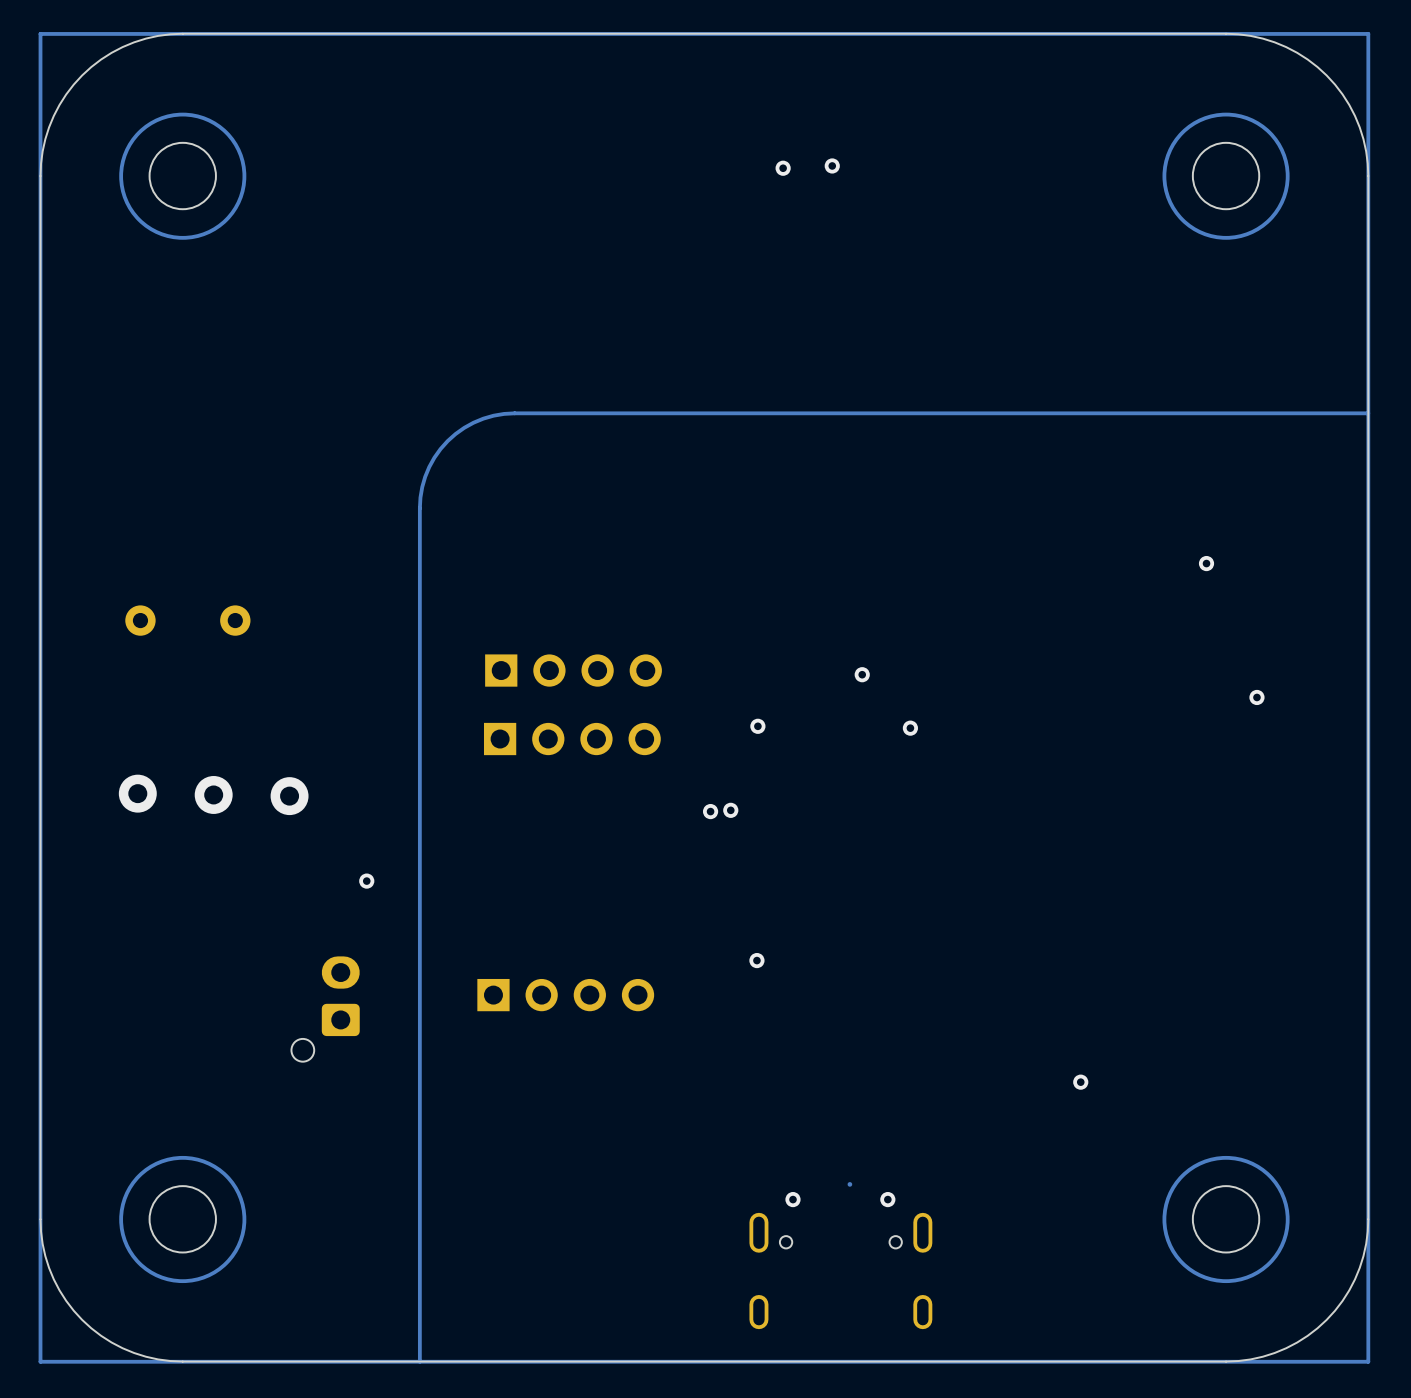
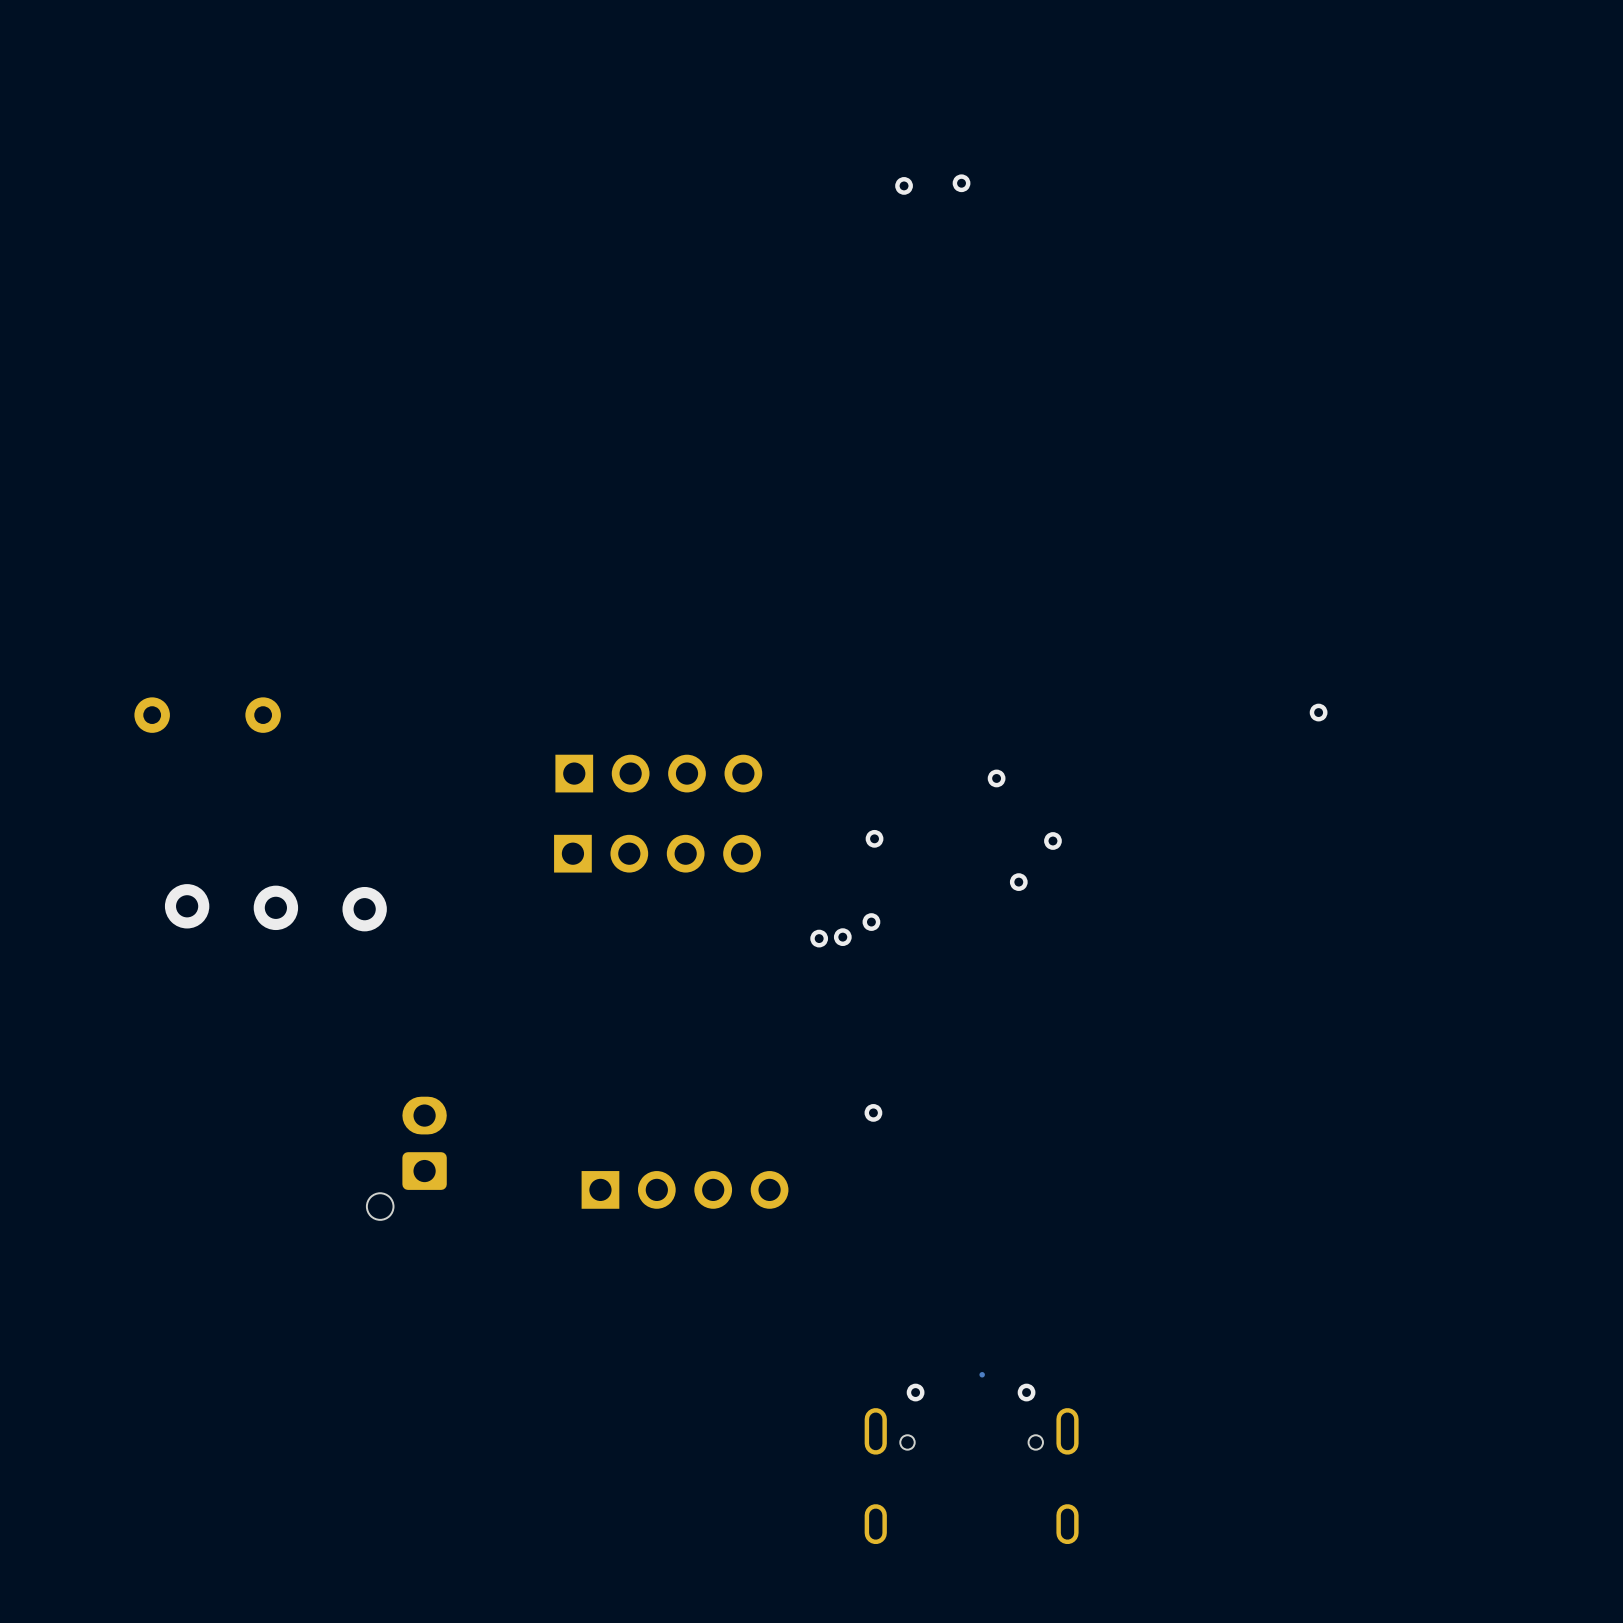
board edge: (1226, 33) (170, 34) (145, 38) (122, 47) (91, 67) (73, 84) (59, 104) (49, 127) (42, 151) (40, 176) (40, 1219) (45, 1256) (53, 1279) (66, 1300) (91, 1328) (111, 1342) (134, 1352) (158, 1359) (182, 1361) (1226, 1361) (1250, 1359) (1286, 1348) (1317, 1328) (1335, 1310) (1349, 1290) (1359, 1267) (1366, 1244) (1368, 1219) (1367, 163) (1359, 127) (1349, 104) (1335, 84) (1317, 67) (1297, 52) (1274, 42) (1250, 35) (1226, 33) -> none
track: (1368, 33) (40, 33) (40, 1361) (1368, 1361) (1368, 33) -> none
drawing: [119, 112, 247, 240] -> none
drawing: [1162, 112, 1290, 240] -> none
round board edge: [148, 141, 217, 211] -> none
round board edge: [1191, 141, 1261, 211] -> none
track: (1368, 413) (514, 413) (493, 415) (473, 422) (447, 441) (429, 467) (422, 487) (419, 508) (419, 1361) -> none
via: (1206, 563) -> none
via: none -> (1318, 712)
via: (1256, 697) -> none
via: none -> (1018, 882)
via: none -> (187, 906)
via: none -> (275, 907)
via: none -> (364, 909)
via: (137, 793) -> none
via: (213, 794) -> none
via: (289, 796) -> none
via: none -> (871, 922)
via: (366, 881) -> none
part position: (565, 995) -> (685, 1189)
part position: (325, 1009) -> (406, 1158)
via: (1080, 1082) -> none
drawing: [119, 1155, 247, 1284] -> none
drawing: [1162, 1155, 1290, 1284] -> none
round board edge: [148, 1185, 217, 1254] -> none
round board edge: [1191, 1185, 1261, 1254] -> none

